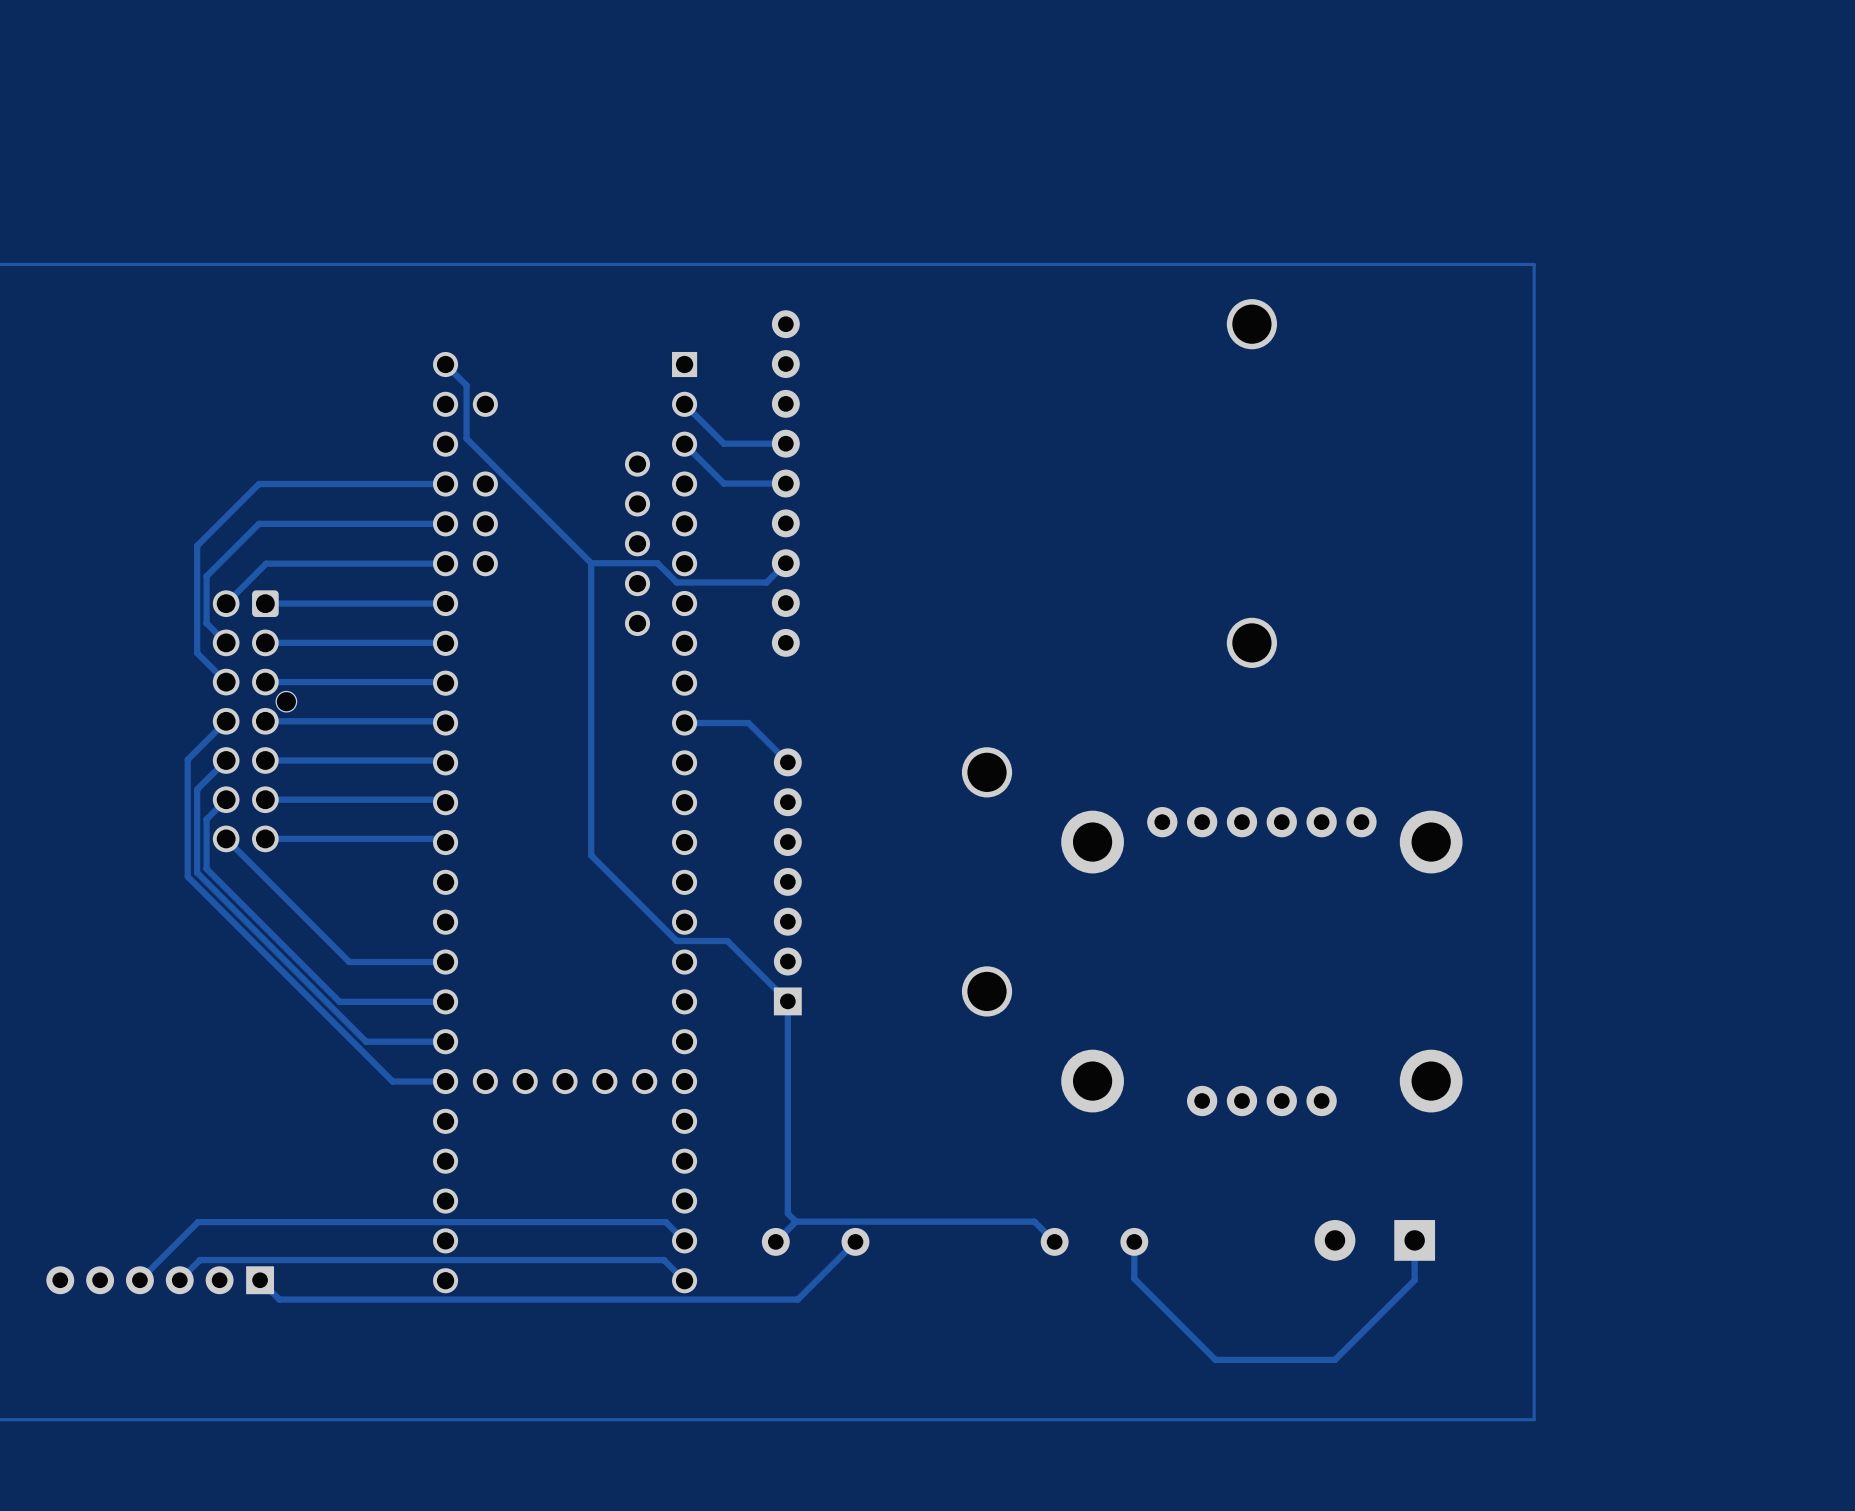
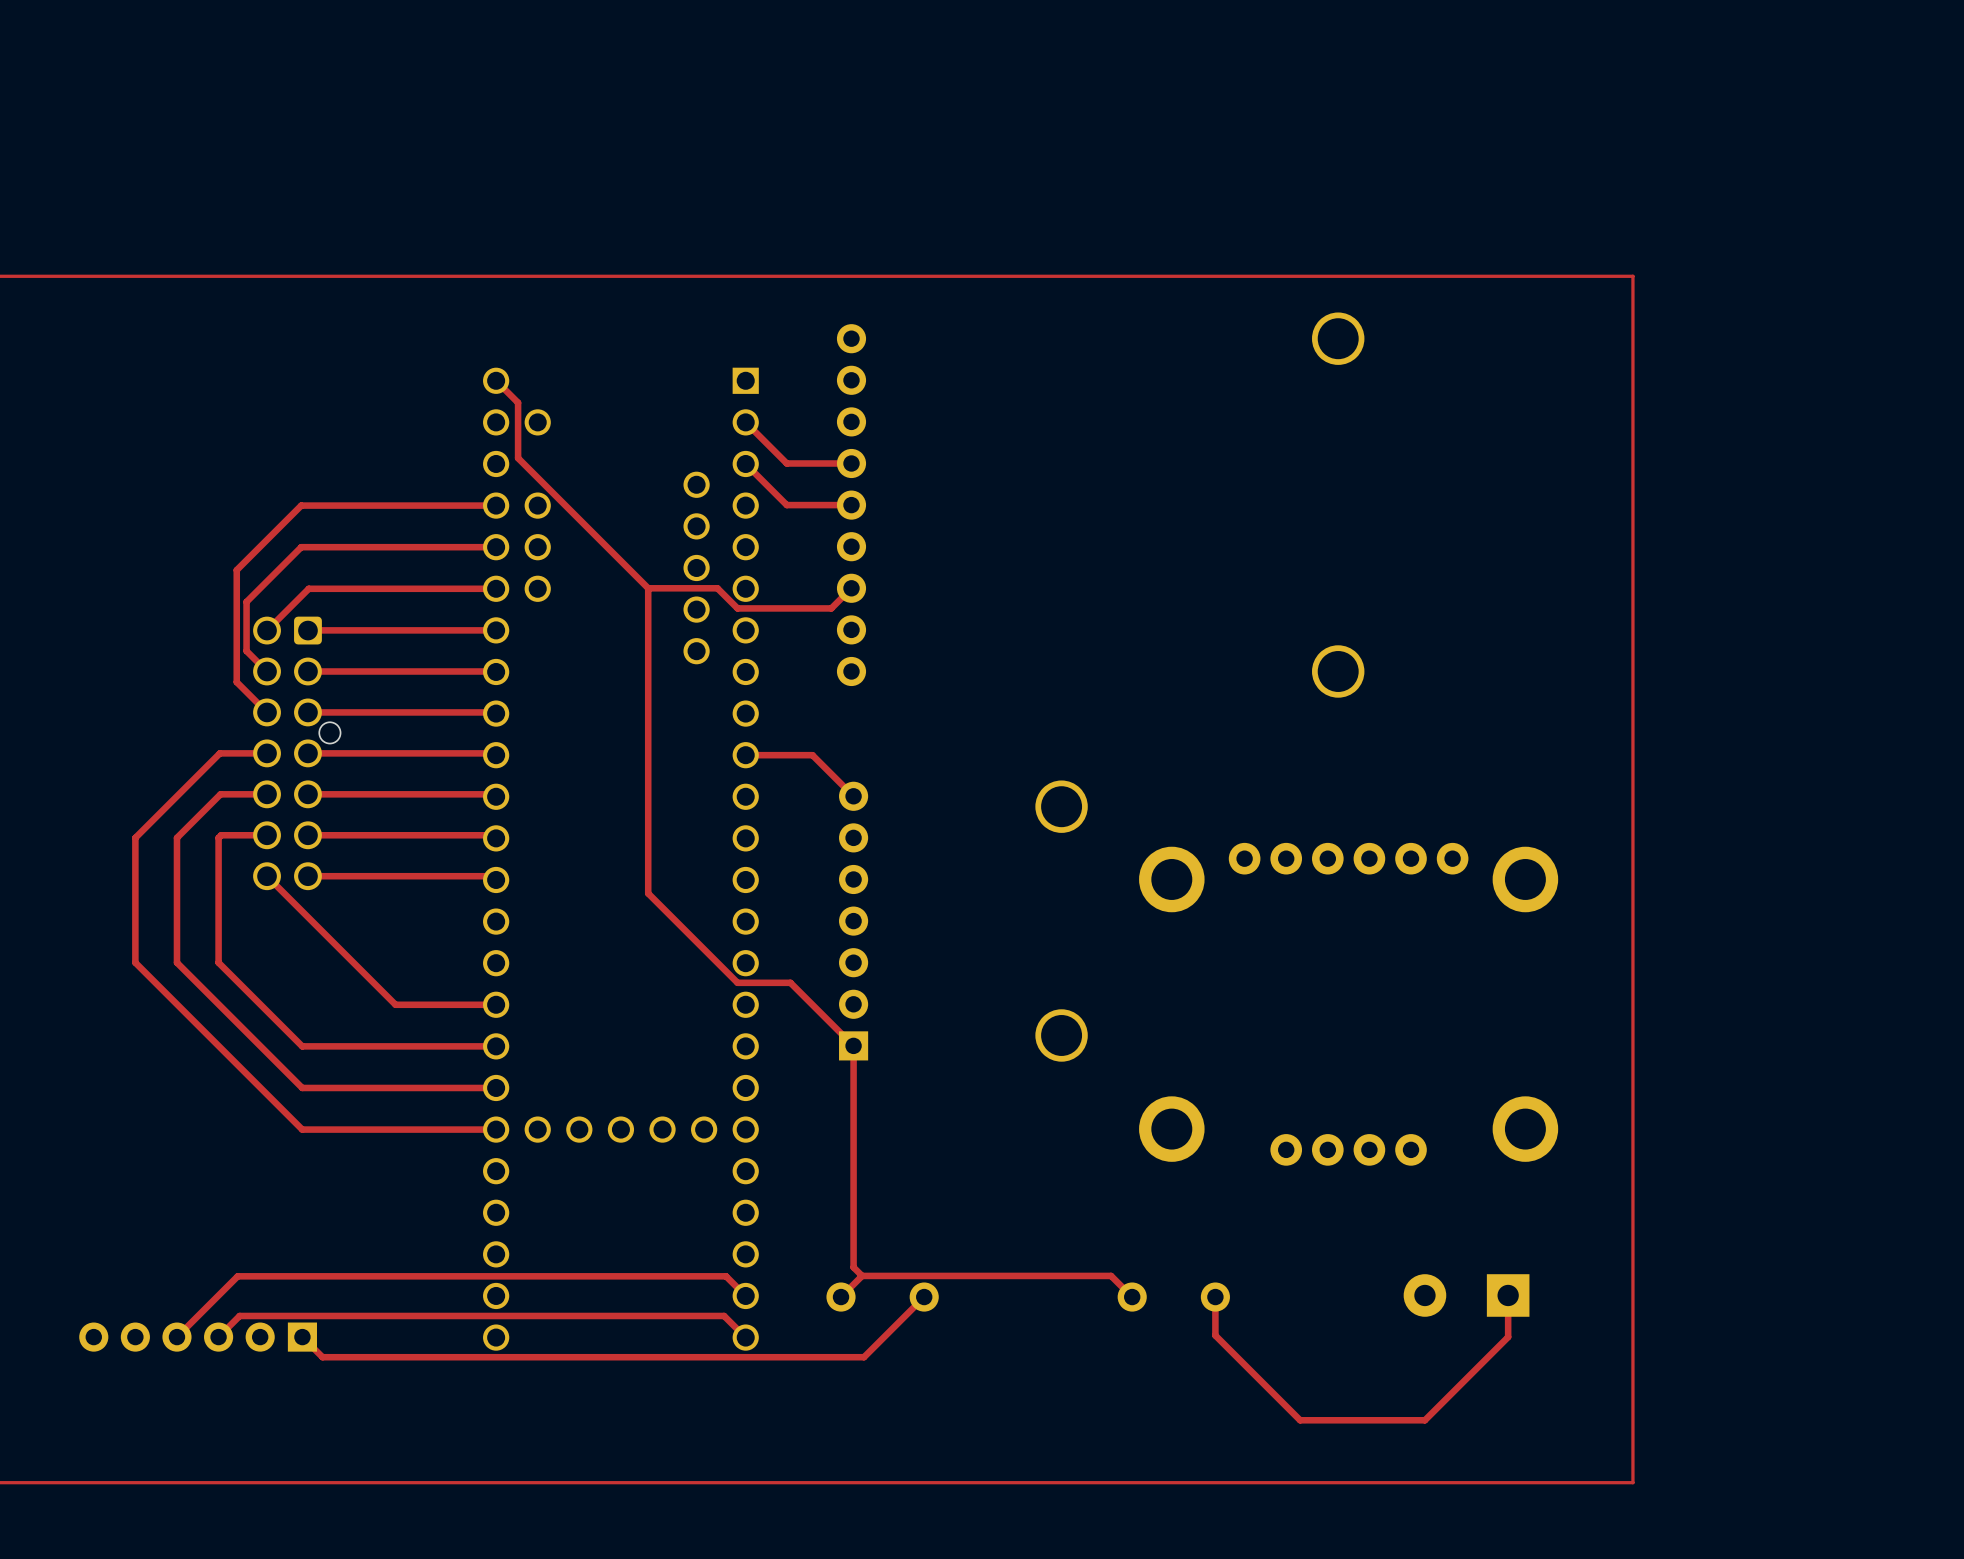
track: (226, 721) (187, 759) (187, 876) (392, 1081) -> (267, 753) (219, 753) (135, 837) (135, 962) (302, 1129) (440, 1129)
track: (226, 760) (197, 789) (197, 872) (366, 1041) -> (267, 794) (220, 794) (176, 837) (176, 962) (302, 1087) (413, 1087)
track: (226, 799) (206, 819) (206, 868) (339, 1001) -> (267, 835) (221, 835) (218, 837) (218, 962) (302, 1046) (385, 1046)

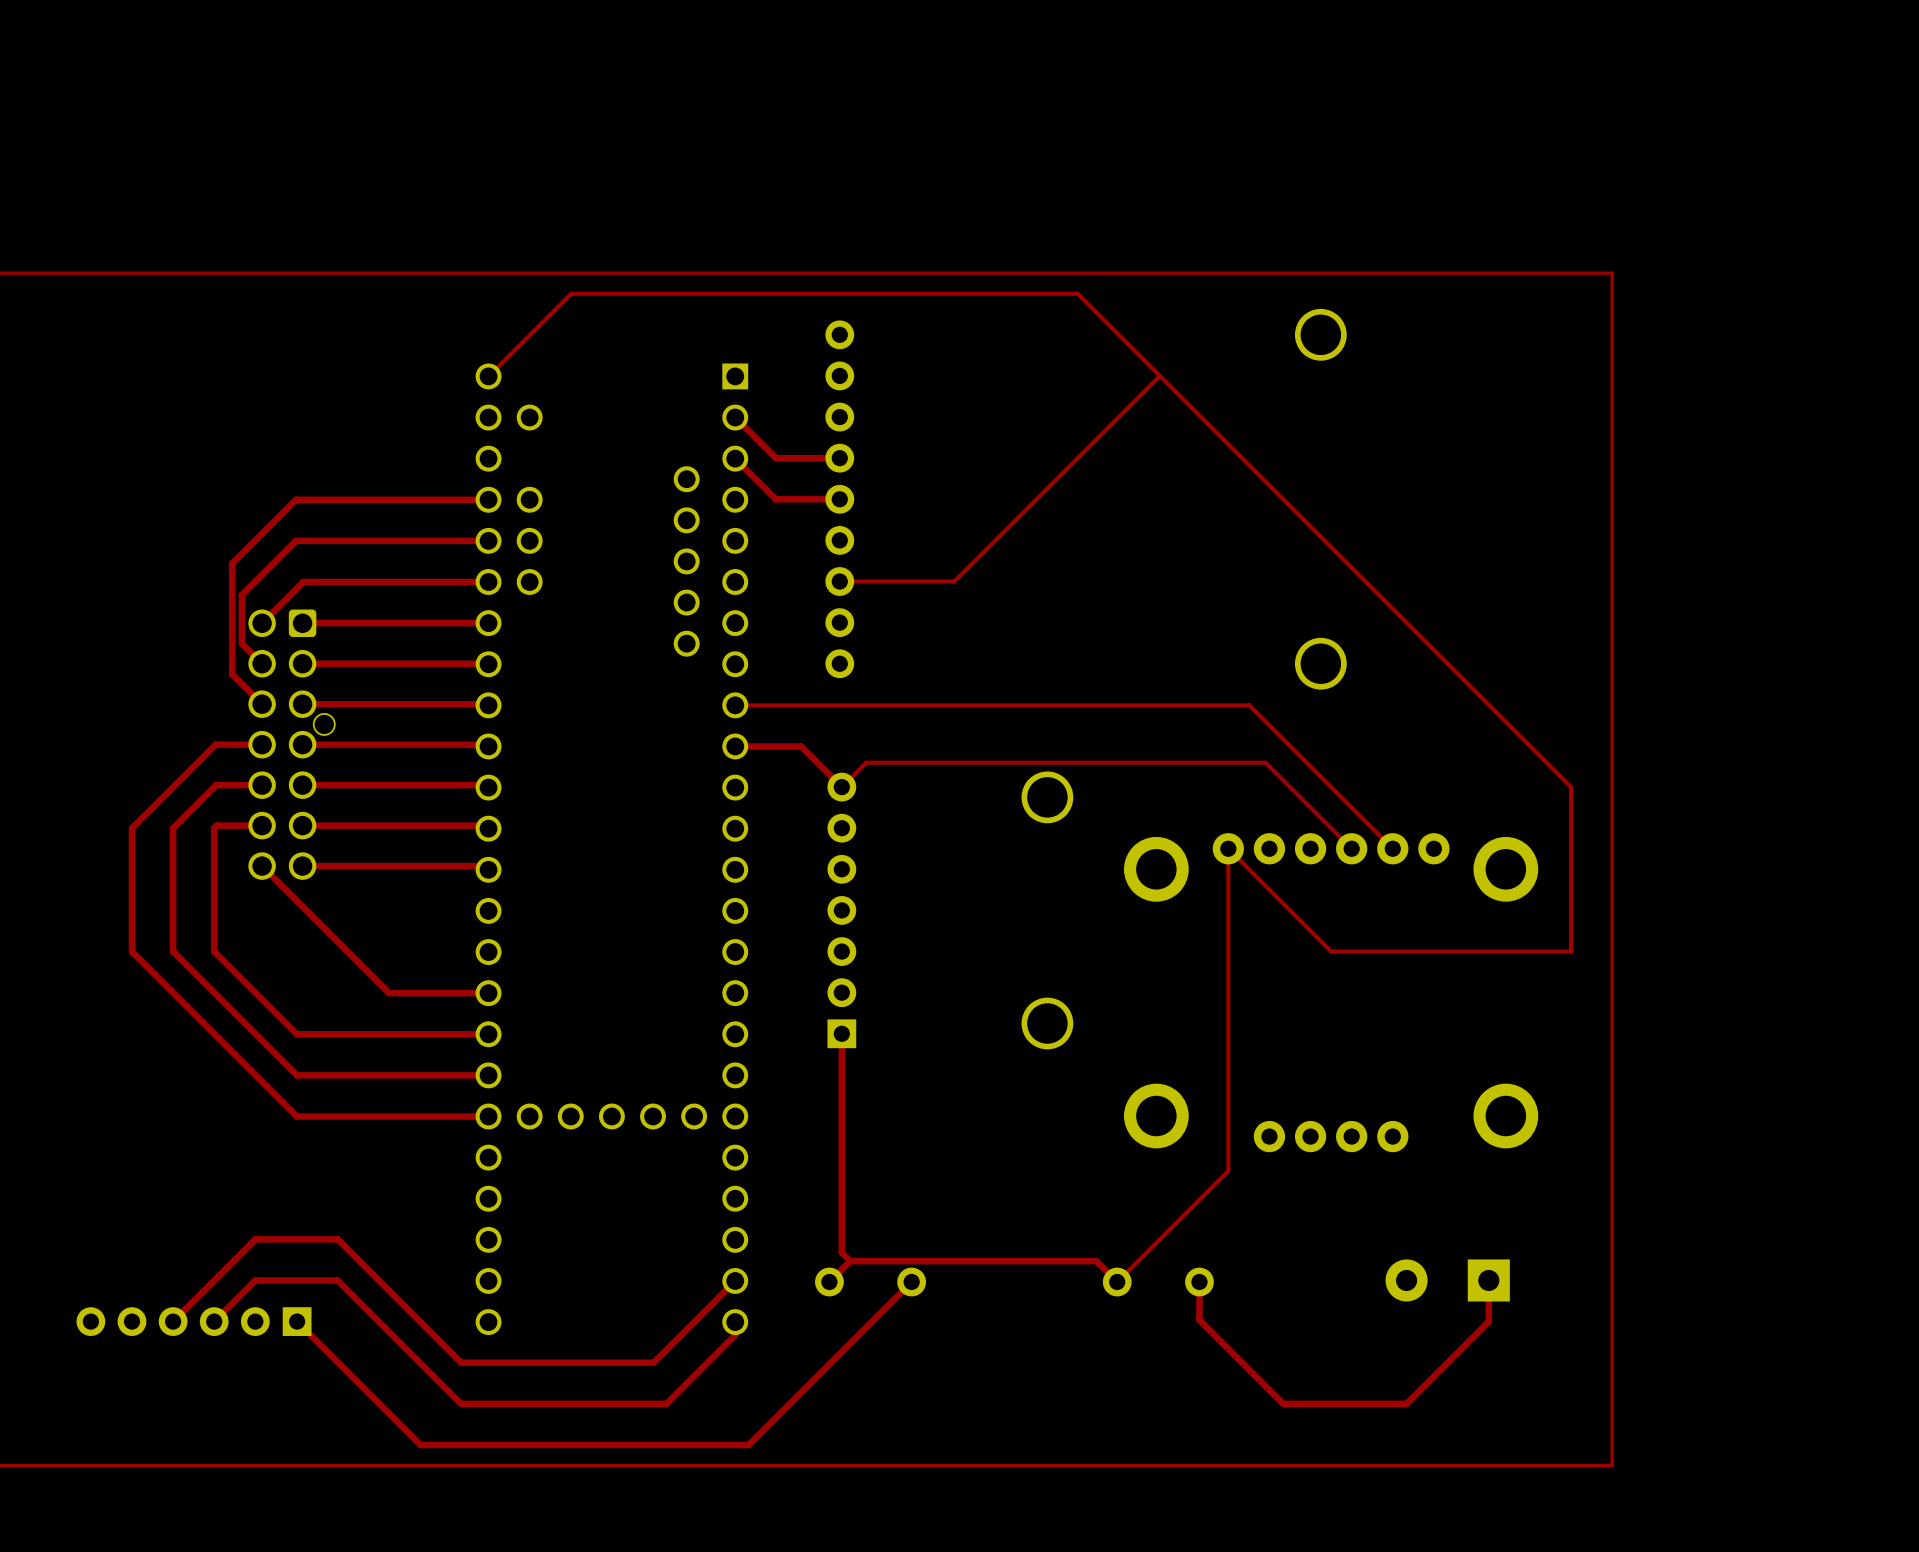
track: (496, 380) (518, 402) (518, 458) (648, 588) -> (488, 376) (571, 293) (1077, 293) (1571, 787) (1571, 951) (1331, 951) (1228, 848) (1228, 1170) (1117, 1282)
track: (648, 588) (717, 588) (737, 608) (831, 608) (851, 588) -> (1159, 375) (954, 581) (839, 581)
track: (648, 588) (648, 893) (737, 982) (790, 982) (853, 1045) -> none
track: none -> (735, 705) (1249, 705) (1392, 848)
track: none -> (841, 787) (866, 762) (1265, 762) (1351, 848)
track: (237, 1276) (726, 1276) (745, 1295) -> (233, 1261) (255, 1239) (337, 1239) (461, 1362) (653, 1362) (735, 1280)
track: (239, 1315) (724, 1315) (745, 1337) -> (235, 1300) (255, 1280) (337, 1280) (460, 1403) (666, 1403) (735, 1335) (735, 1322)
track: (322, 1357) (864, 1357) -> (317, 1341) (420, 1444) (748, 1444) (852, 1341)

